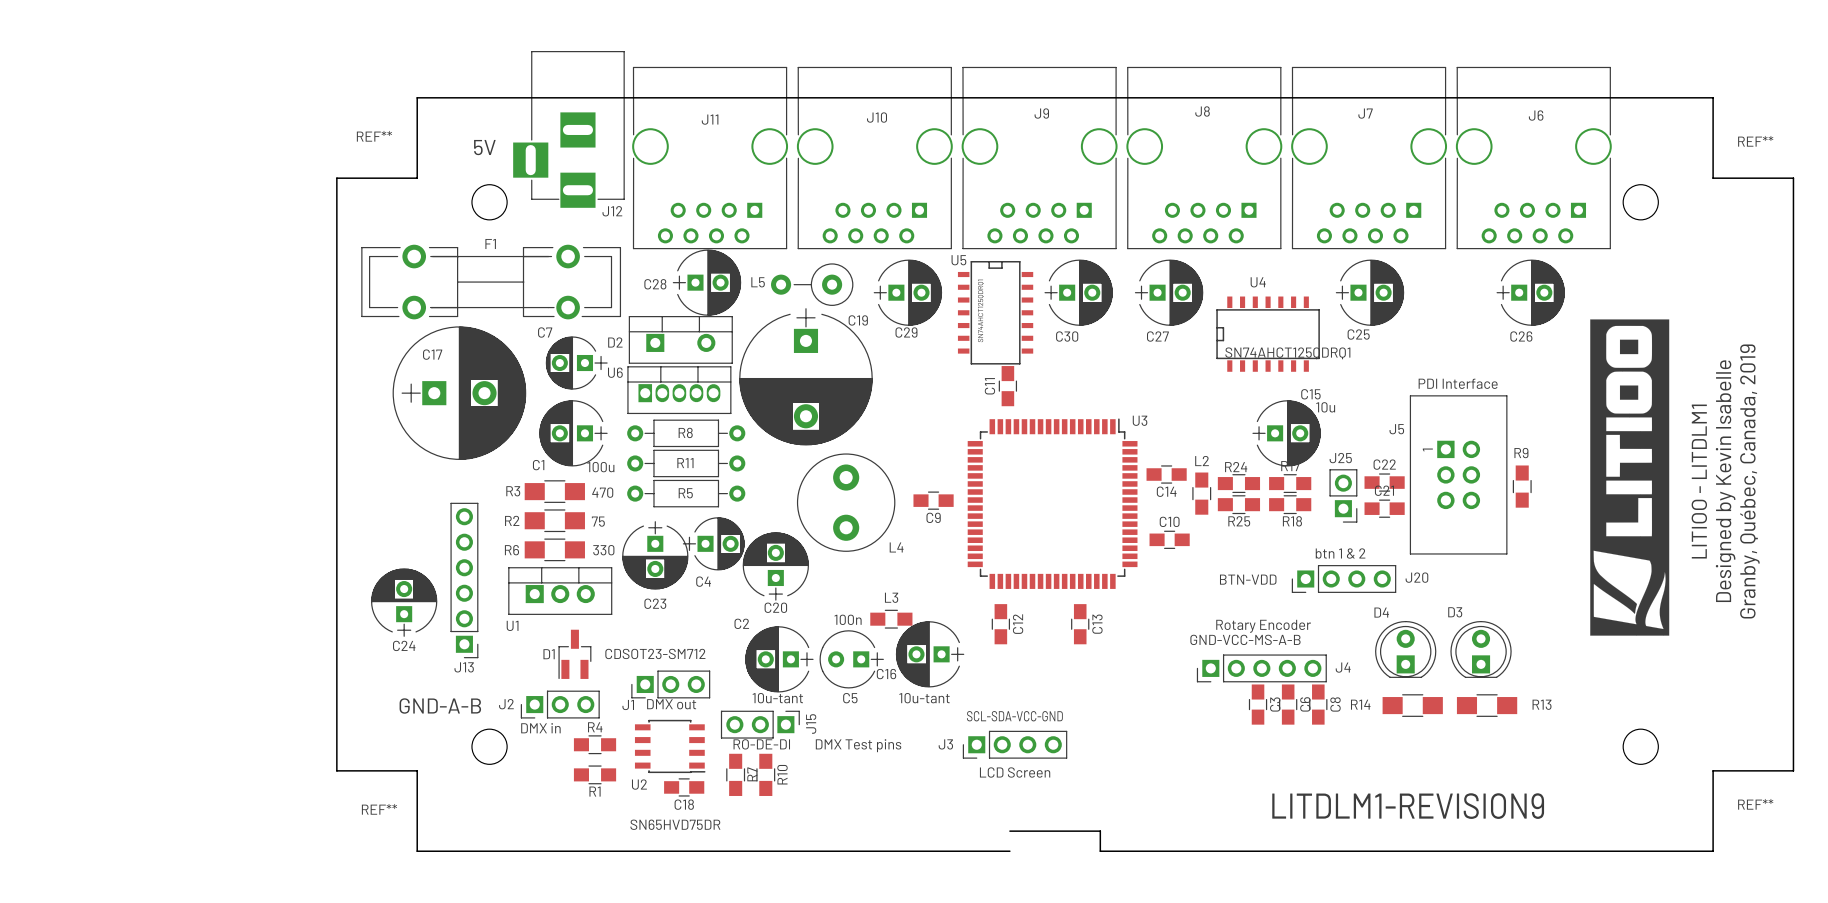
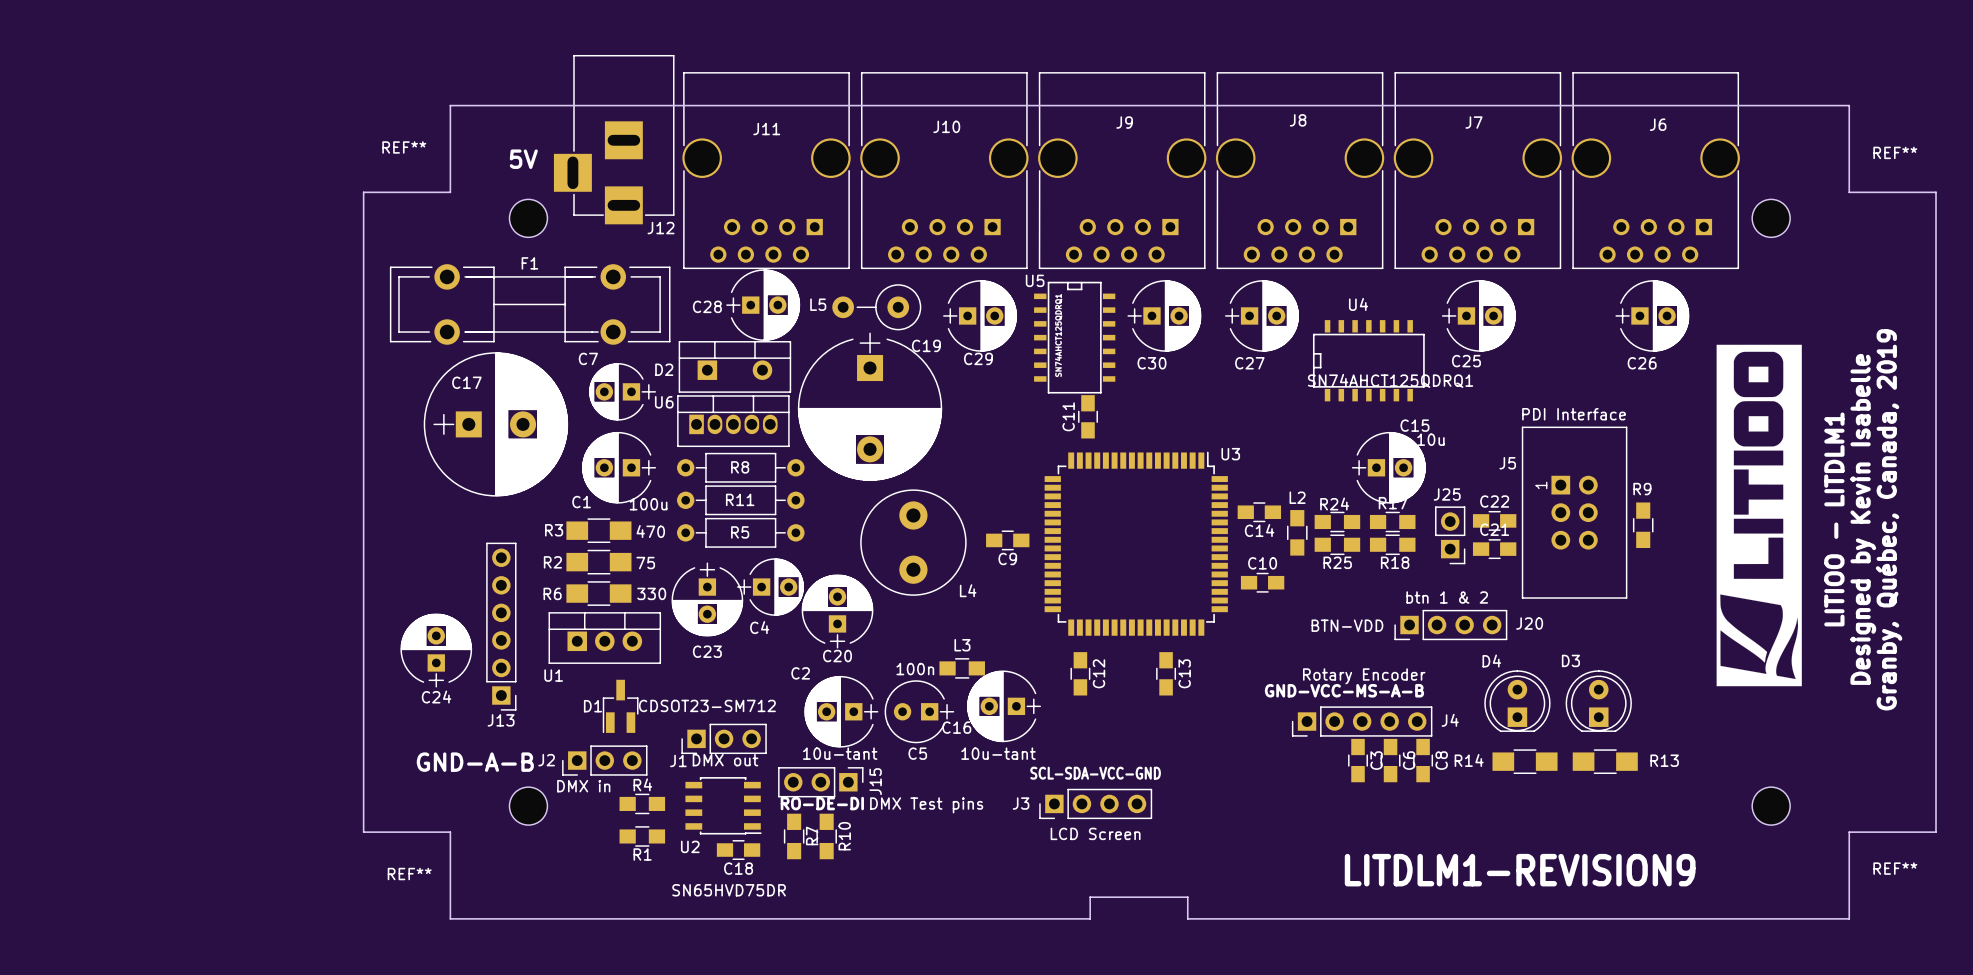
board edge: none -> (1090, 897) (1090, 918)

